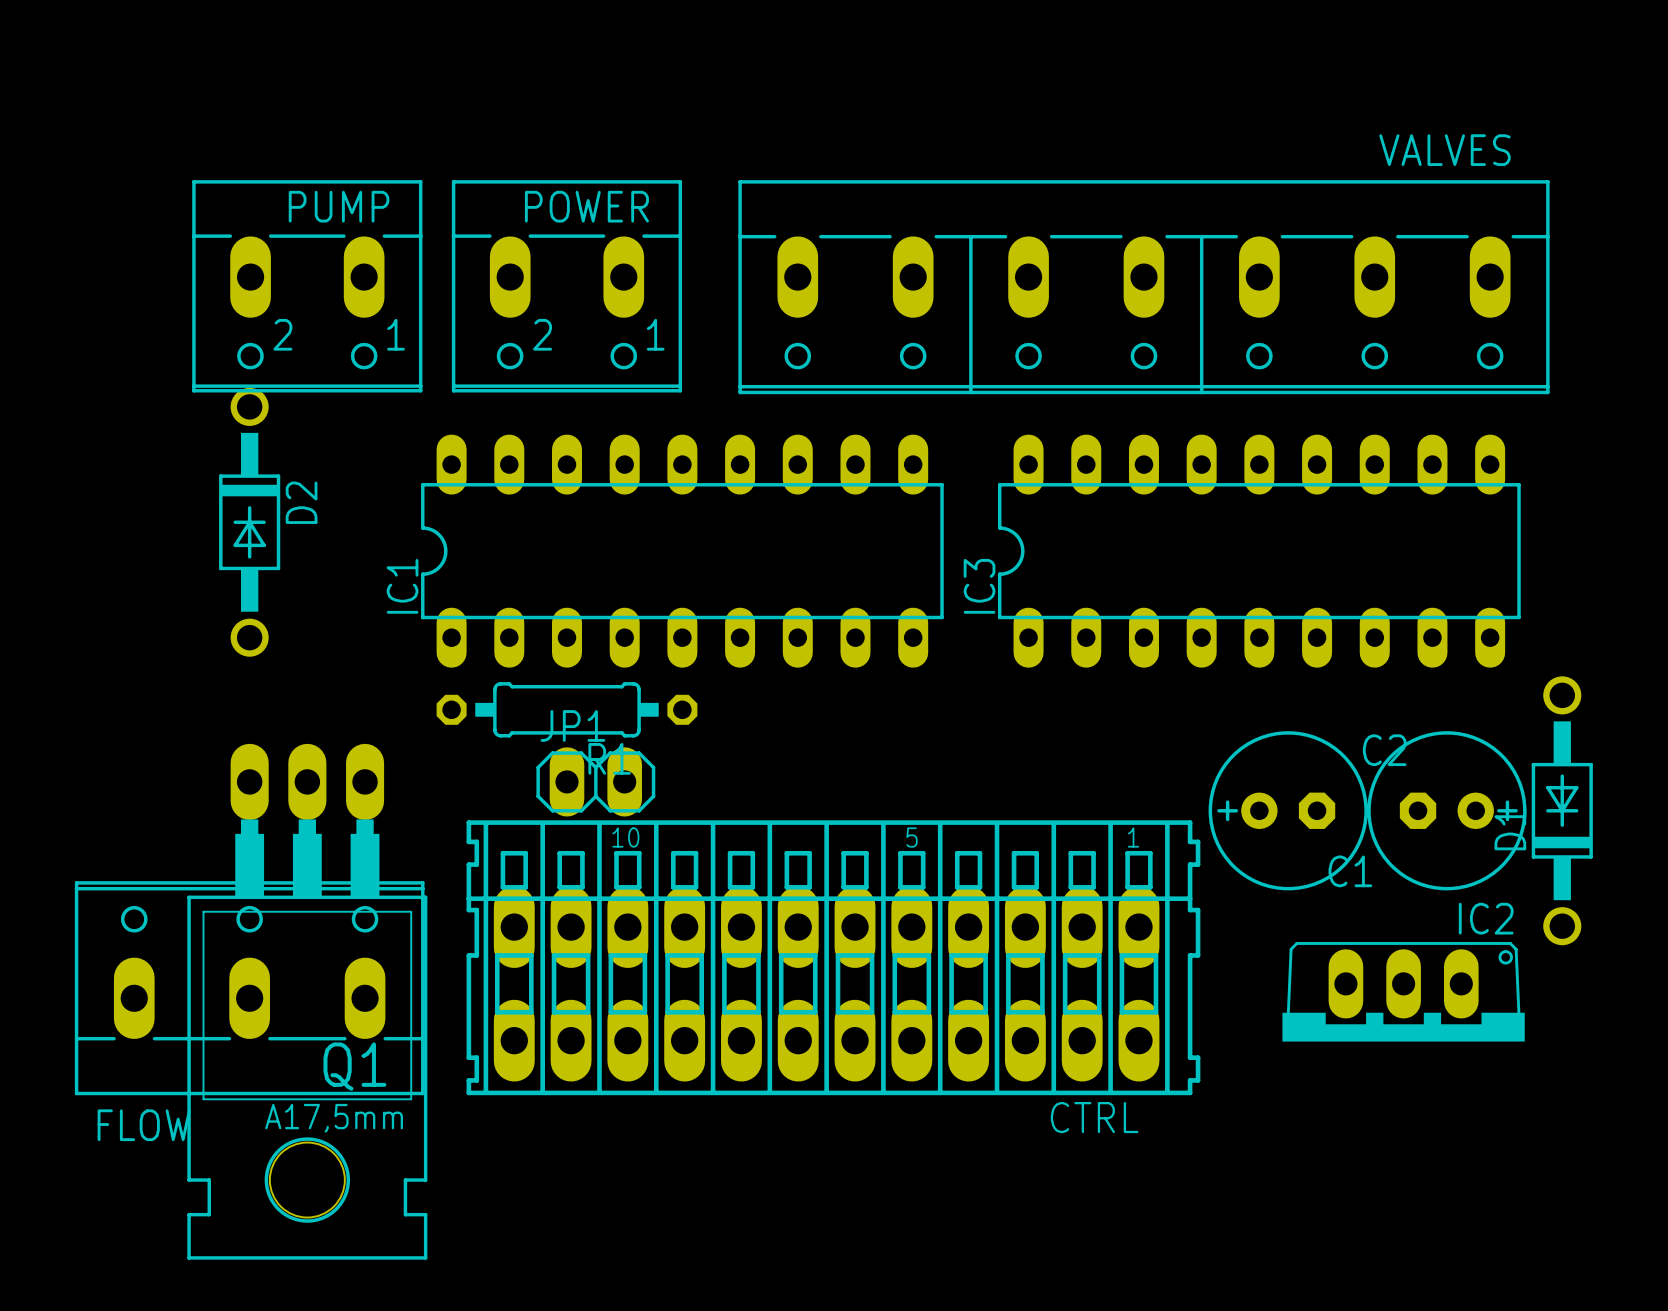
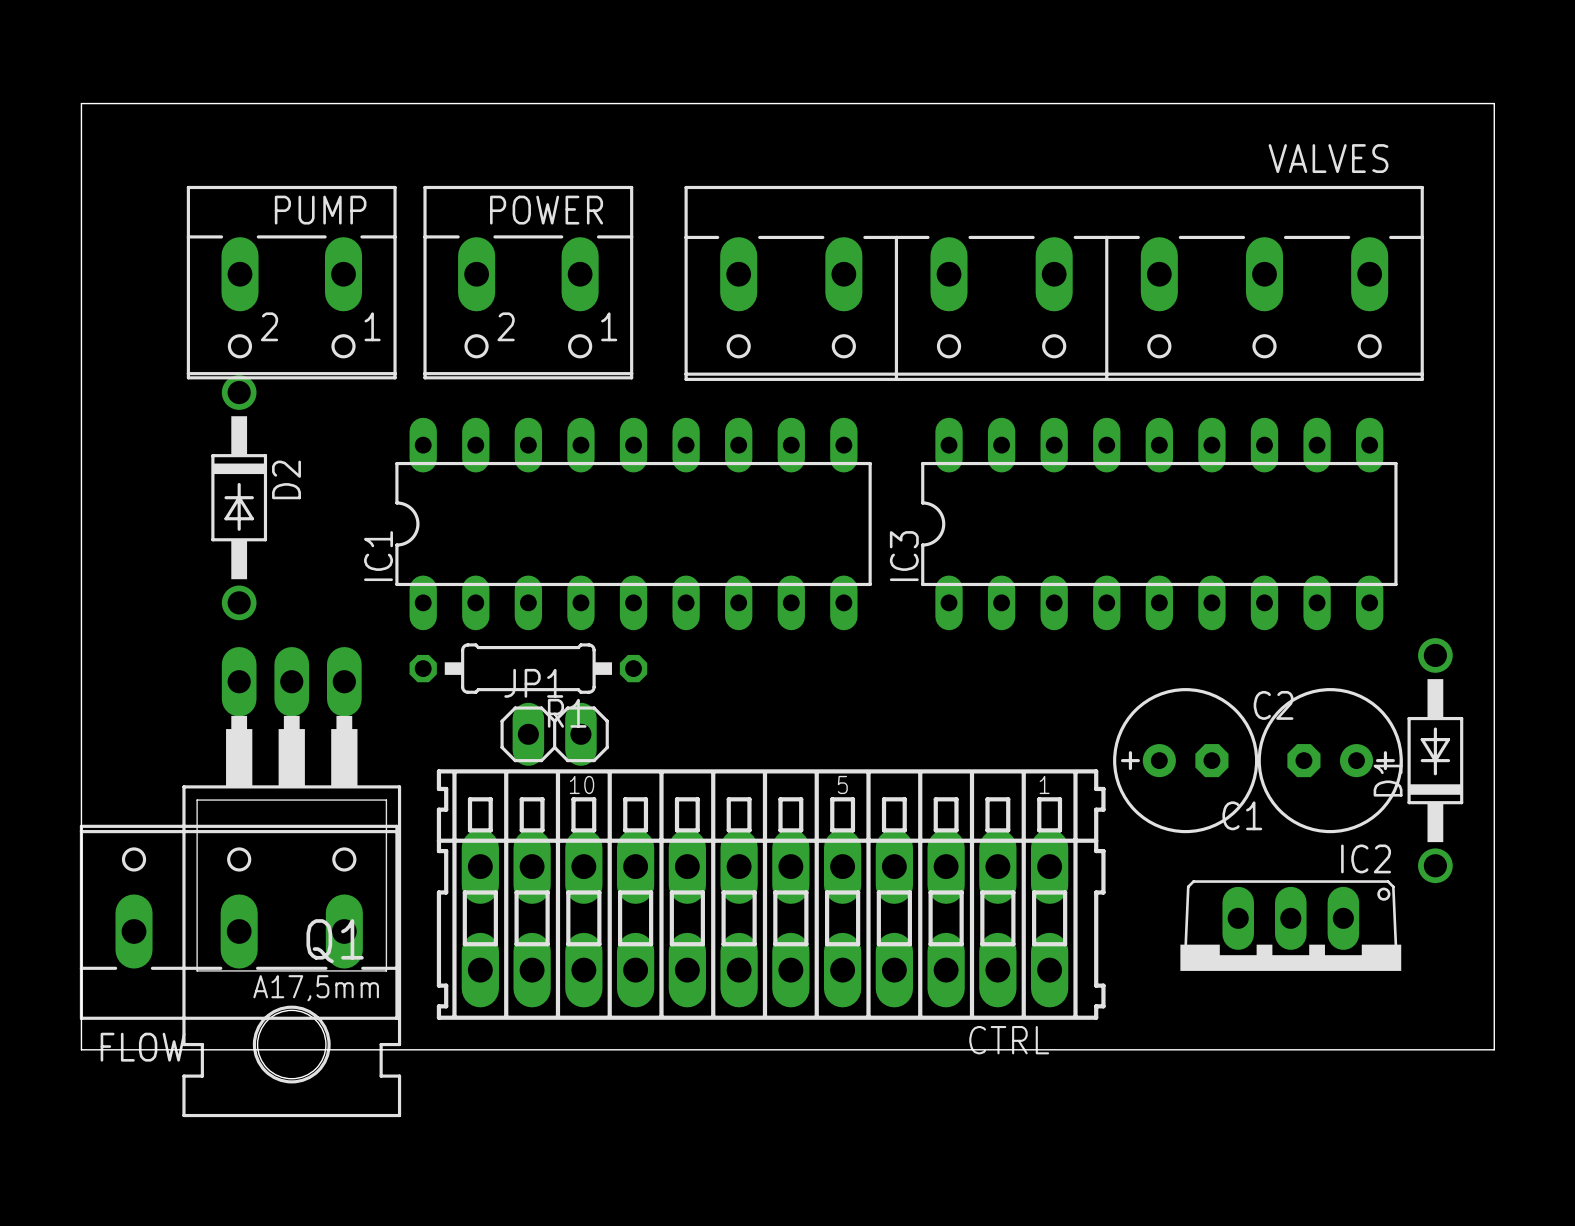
board edge: none -> (81, 103) (1494, 103) (1494, 1049) (81, 1049) (81, 103)
Q1 position: (307, 1001) -> (291, 882)

